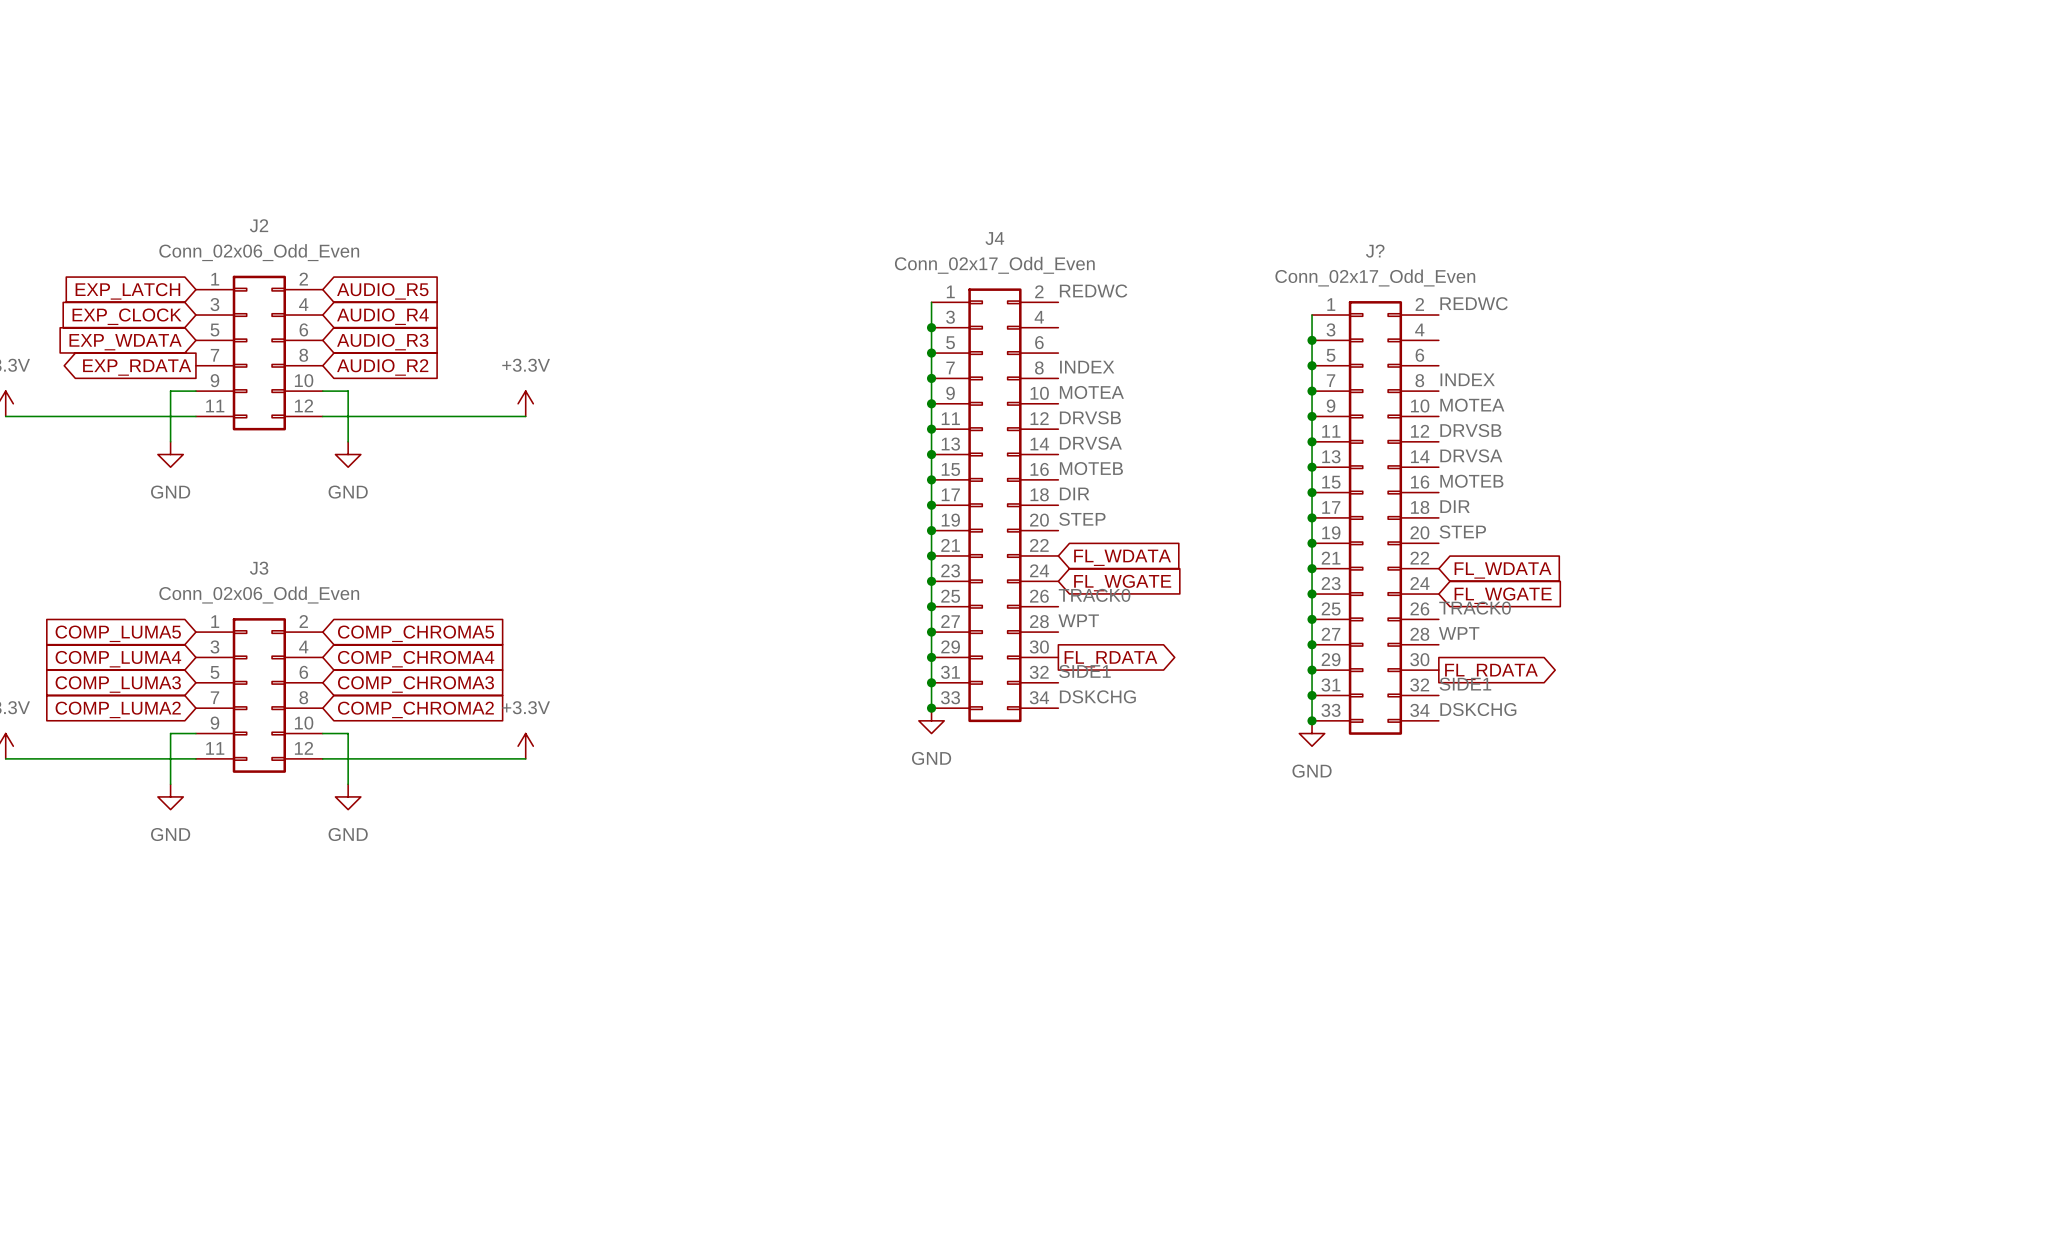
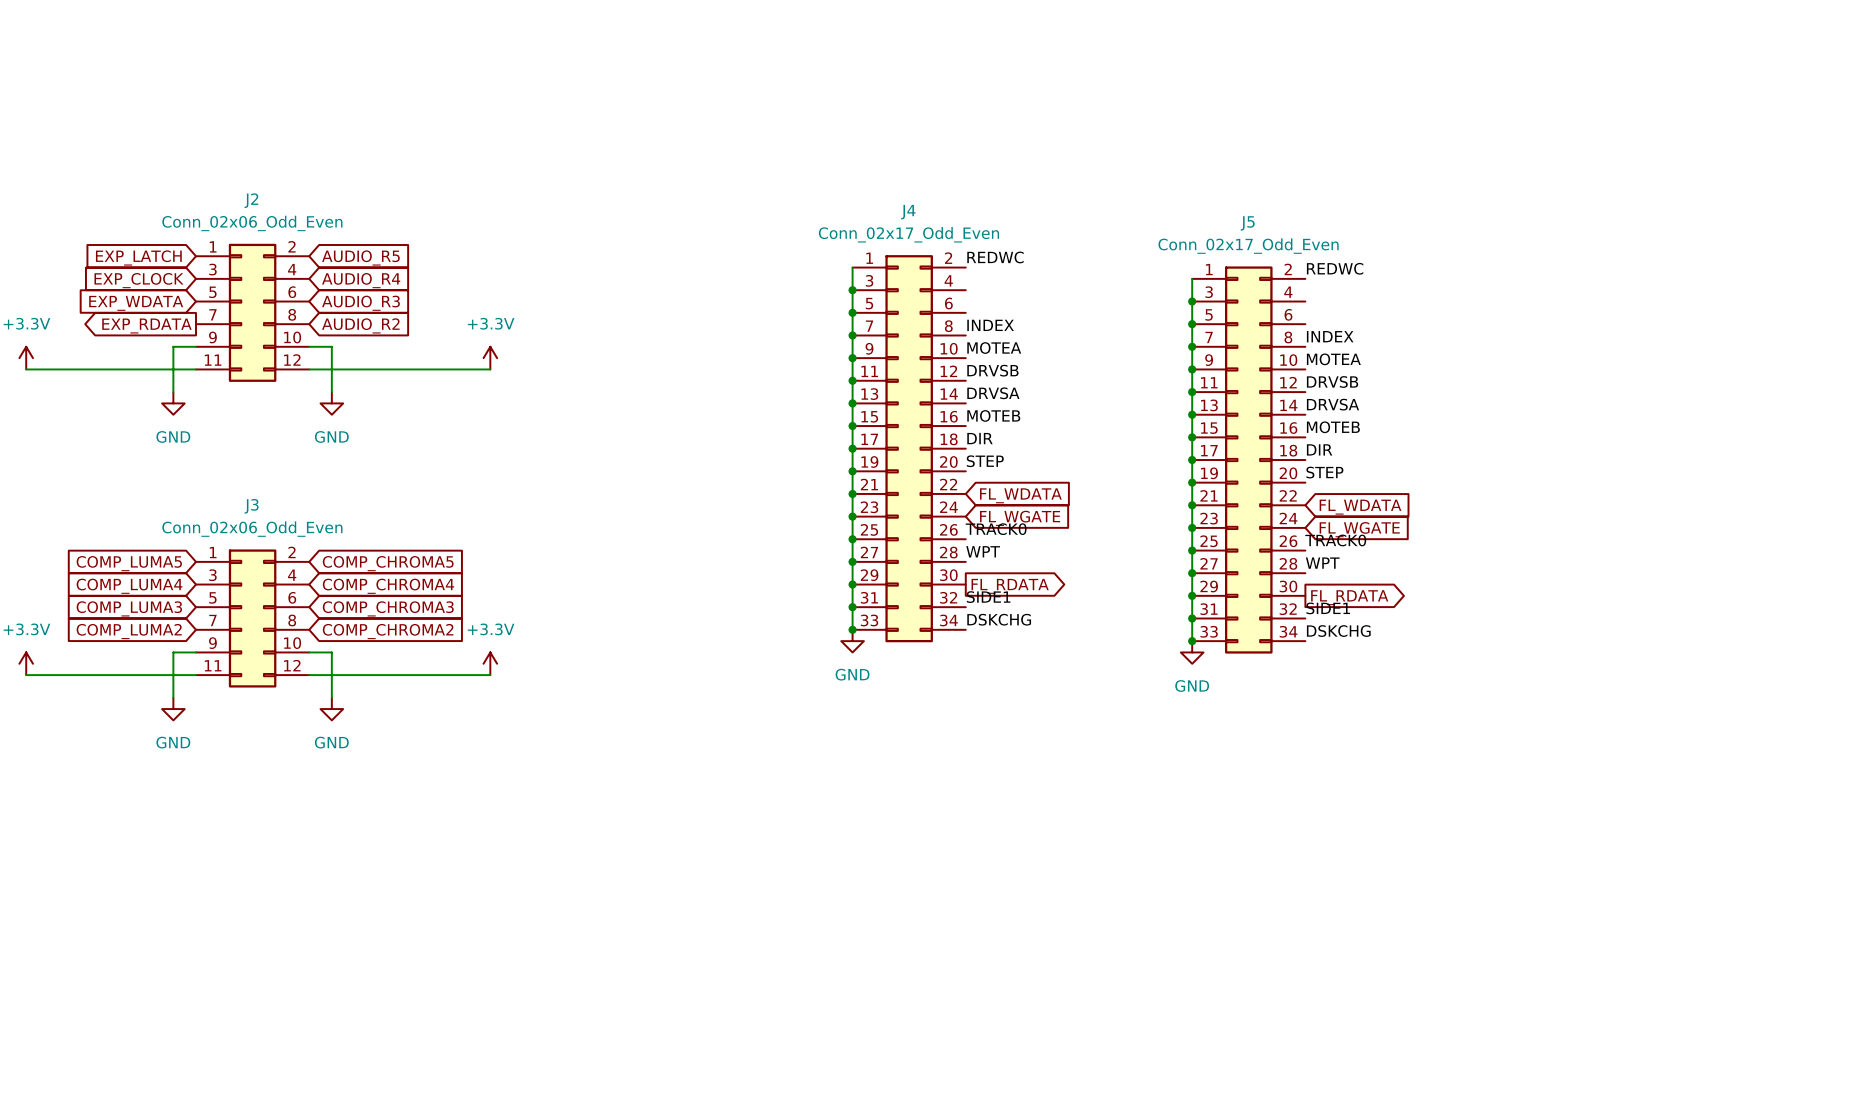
J? name: J? (1375, 251) -> J5 (1247, 223)

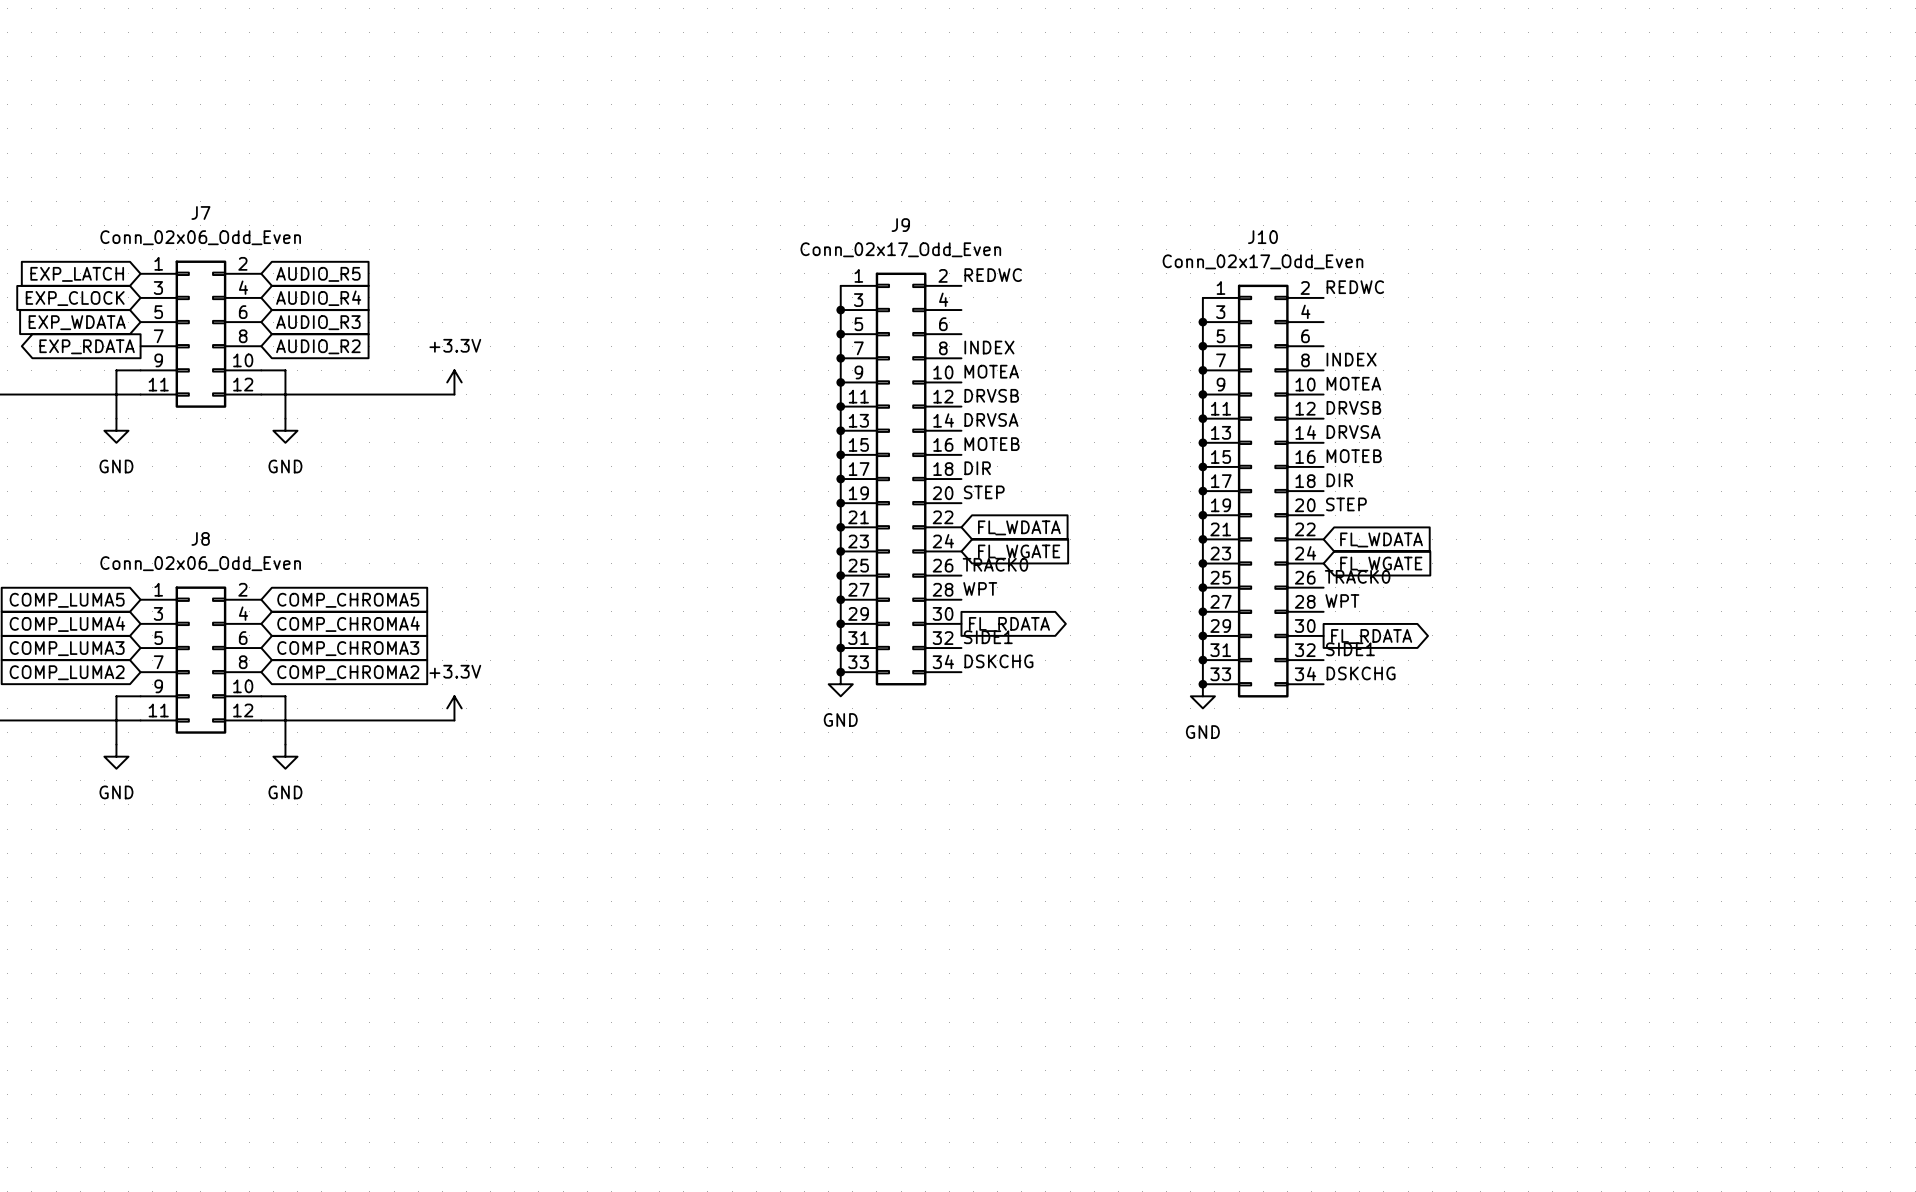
J2 name: J2 (251, 200) -> J7 (200, 212)
J4 name: J4 (908, 212) -> J9 (900, 225)
J5 name: J5 (1247, 223) -> J10 (1262, 237)
J3 name: J3 (251, 506) -> J8 (200, 538)

